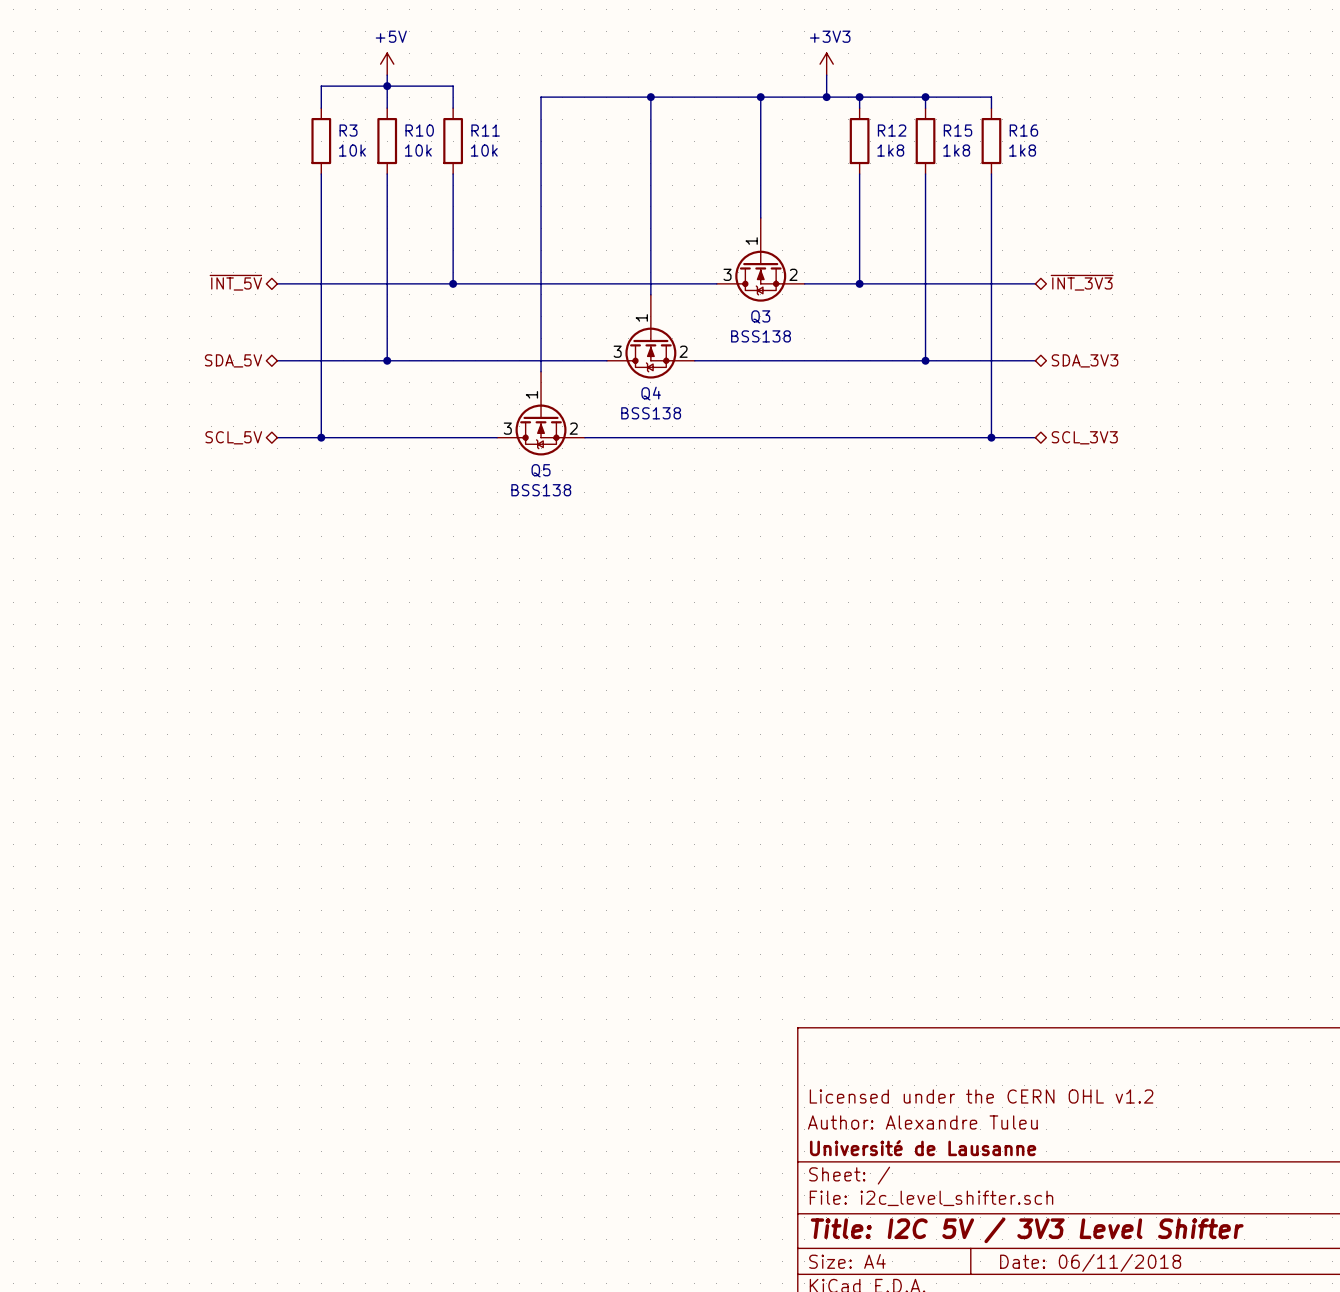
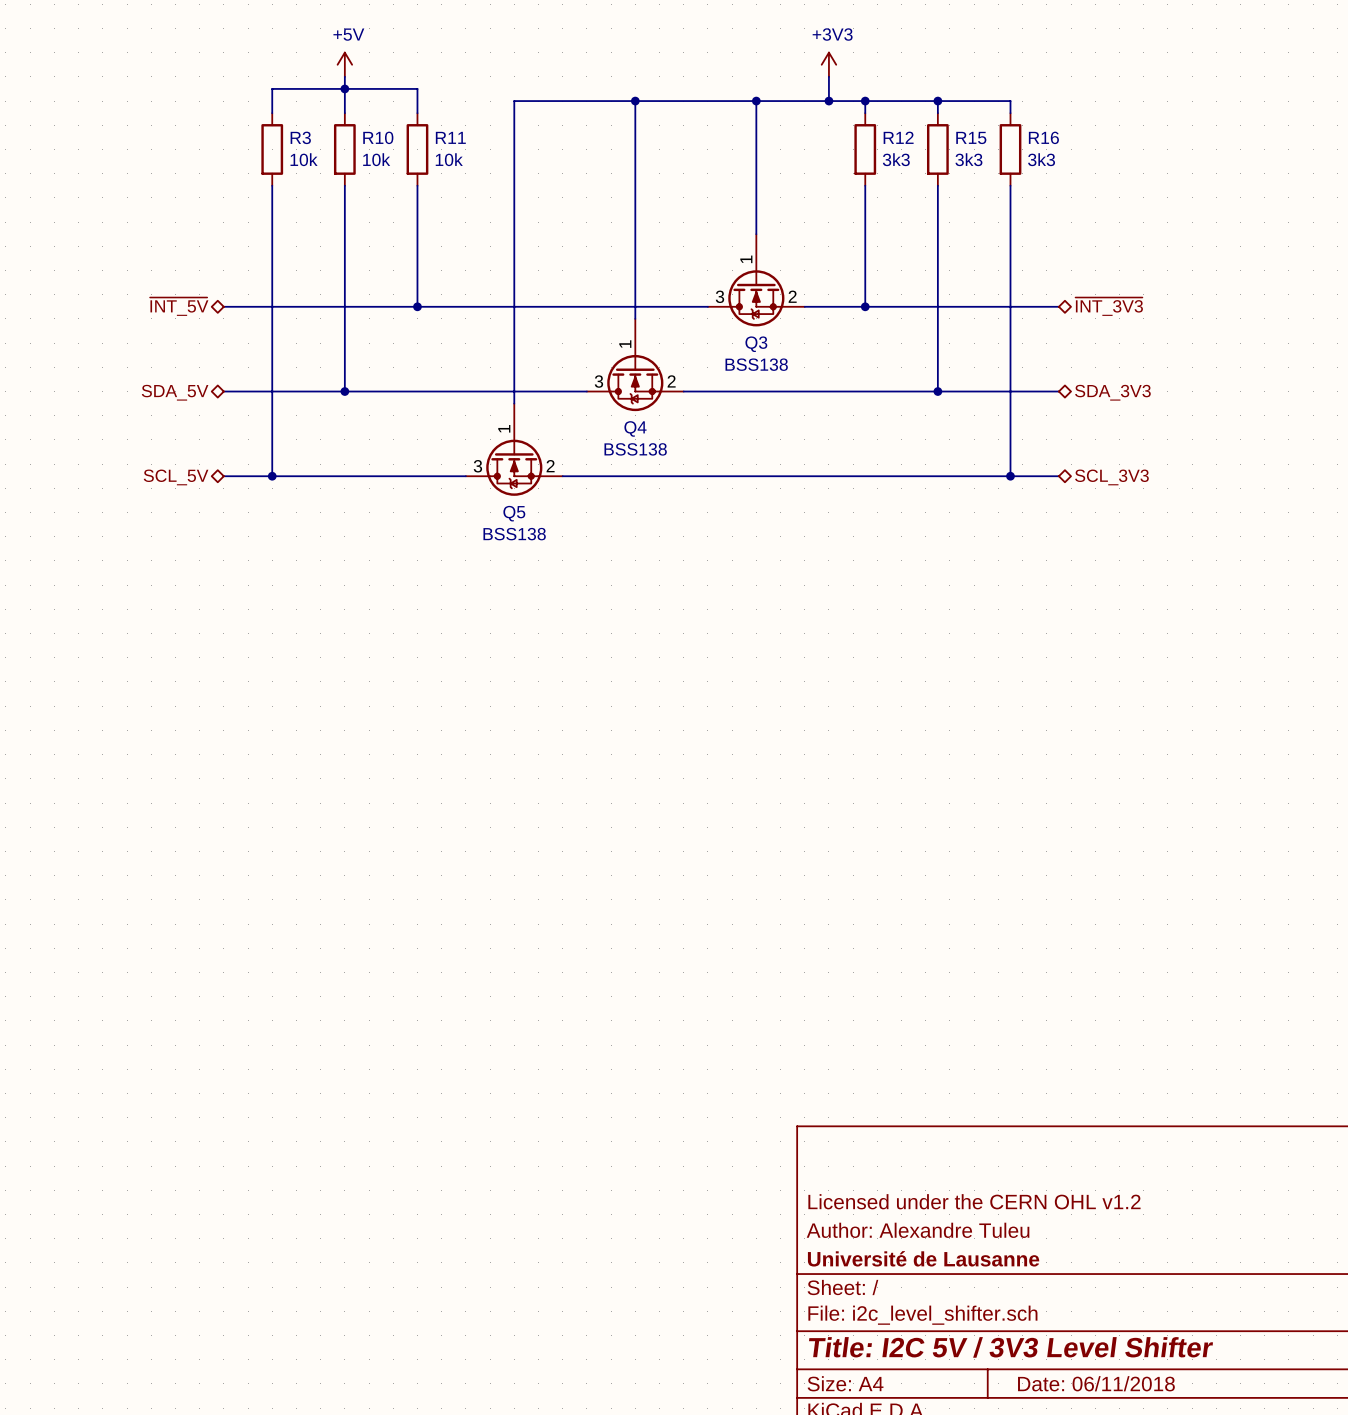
R12 value: 1k8 (890, 150) -> 3k3 (896, 159)
R15 value: 1k8 (956, 150) -> 3k3 (968, 159)
R16 value: 1k8 (1022, 150) -> 3k3 (1041, 159)

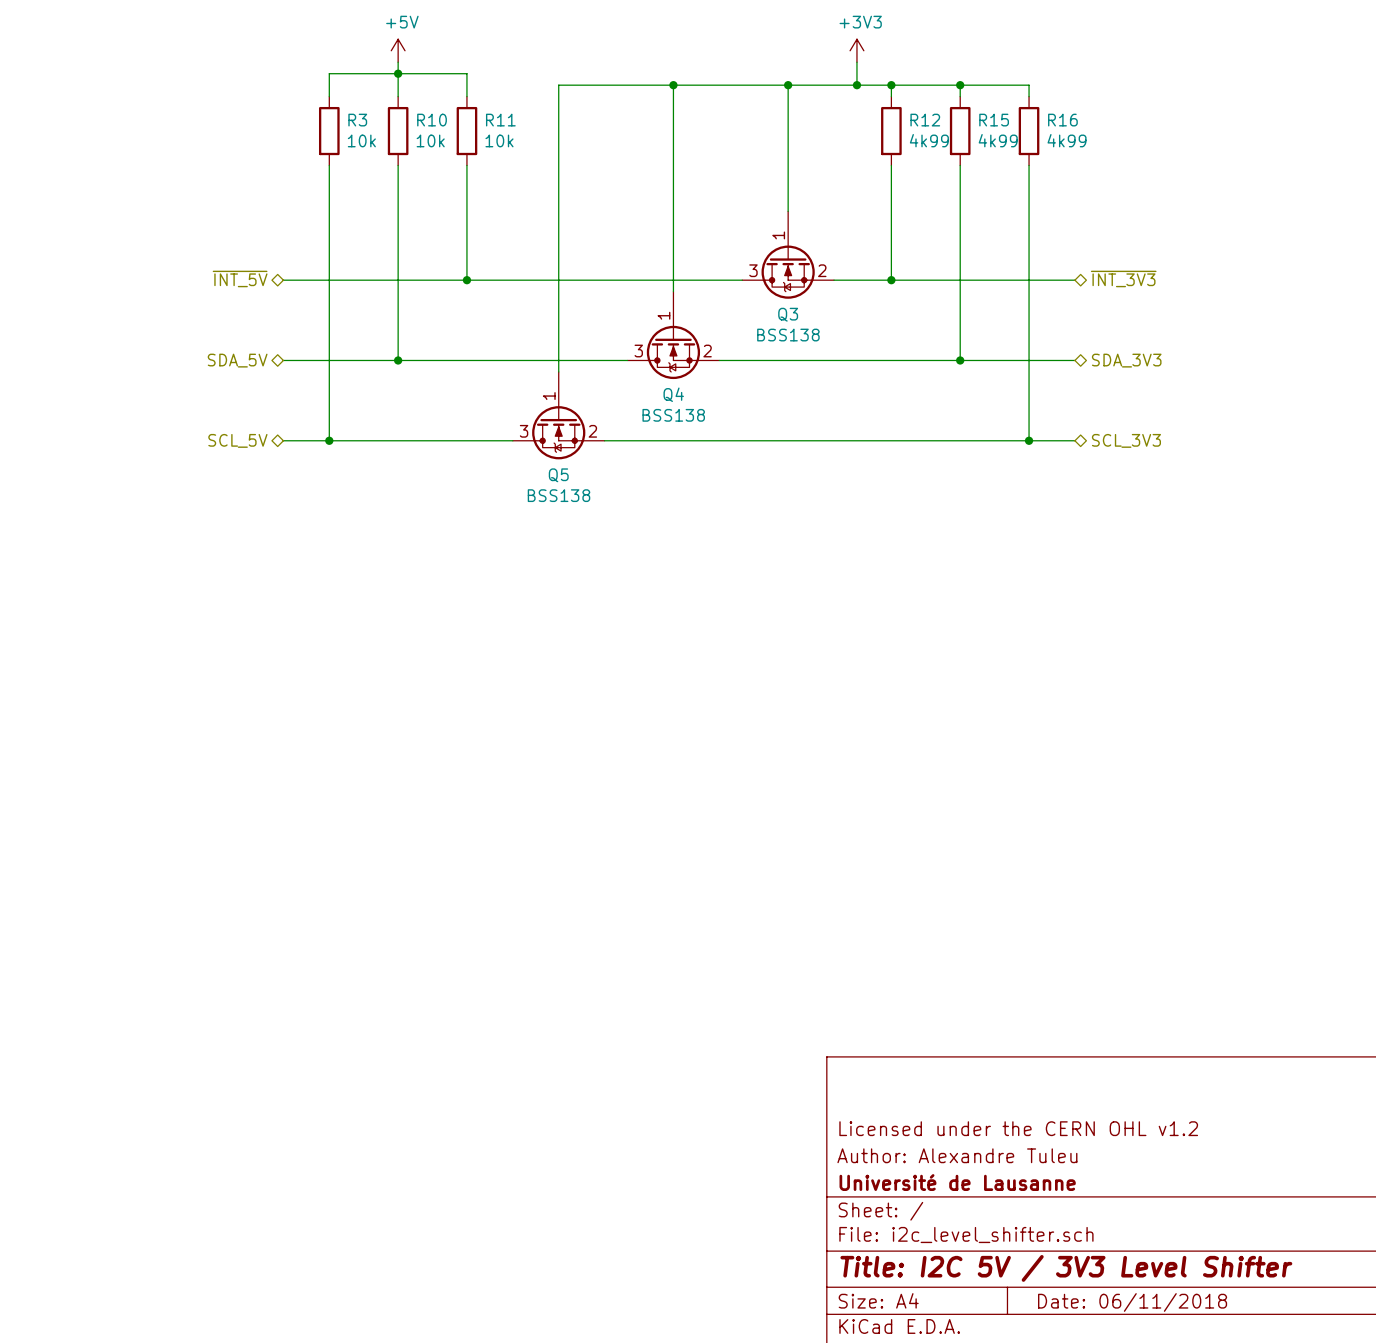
R12 value: 3k3 (896, 159) -> 4k99 (929, 140)
R15 value: 3k3 (968, 159) -> 4k99 (998, 140)
R16 value: 3k3 (1041, 159) -> 4k99 (1067, 140)

